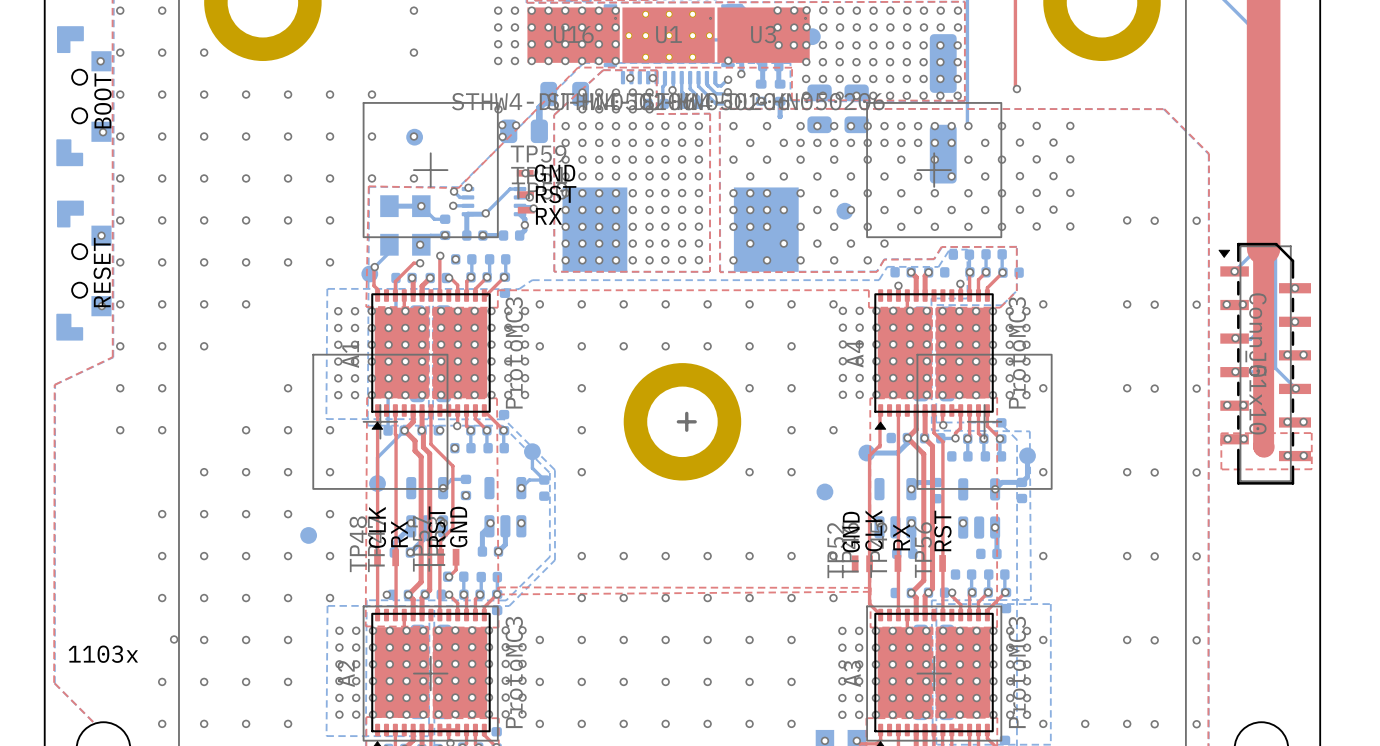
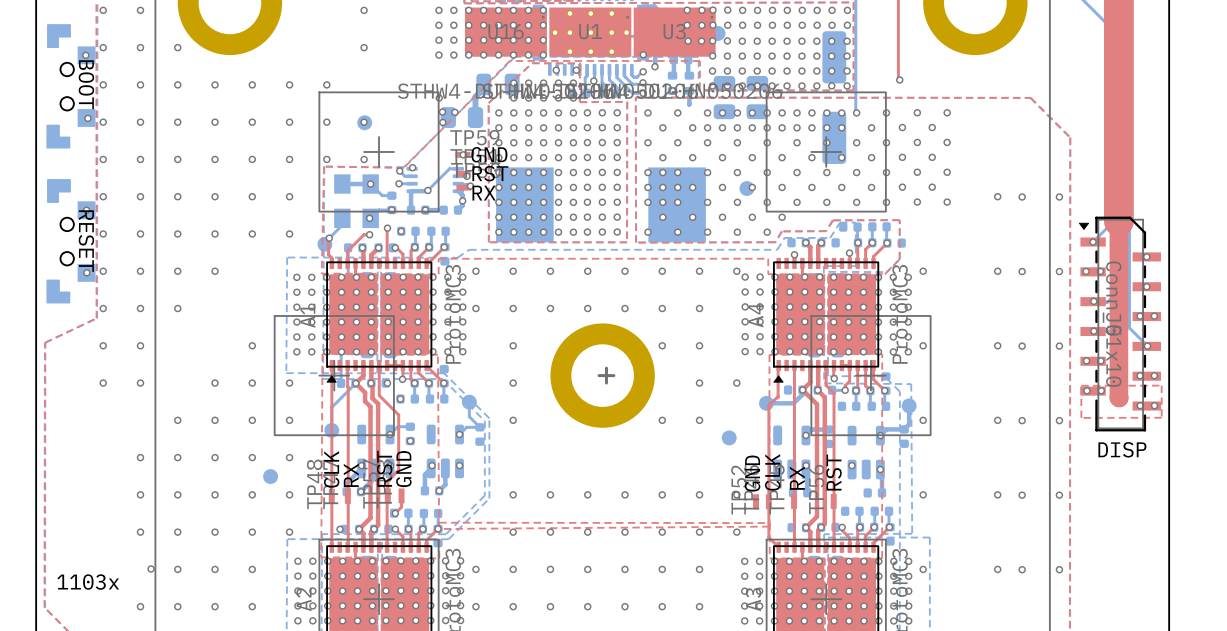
text rotation: 0° (102, 100) -> 180° (86, 84)
text rotation: 0° (102, 272) -> 180° (86, 241)
text: none -> DISP (1122, 449)

